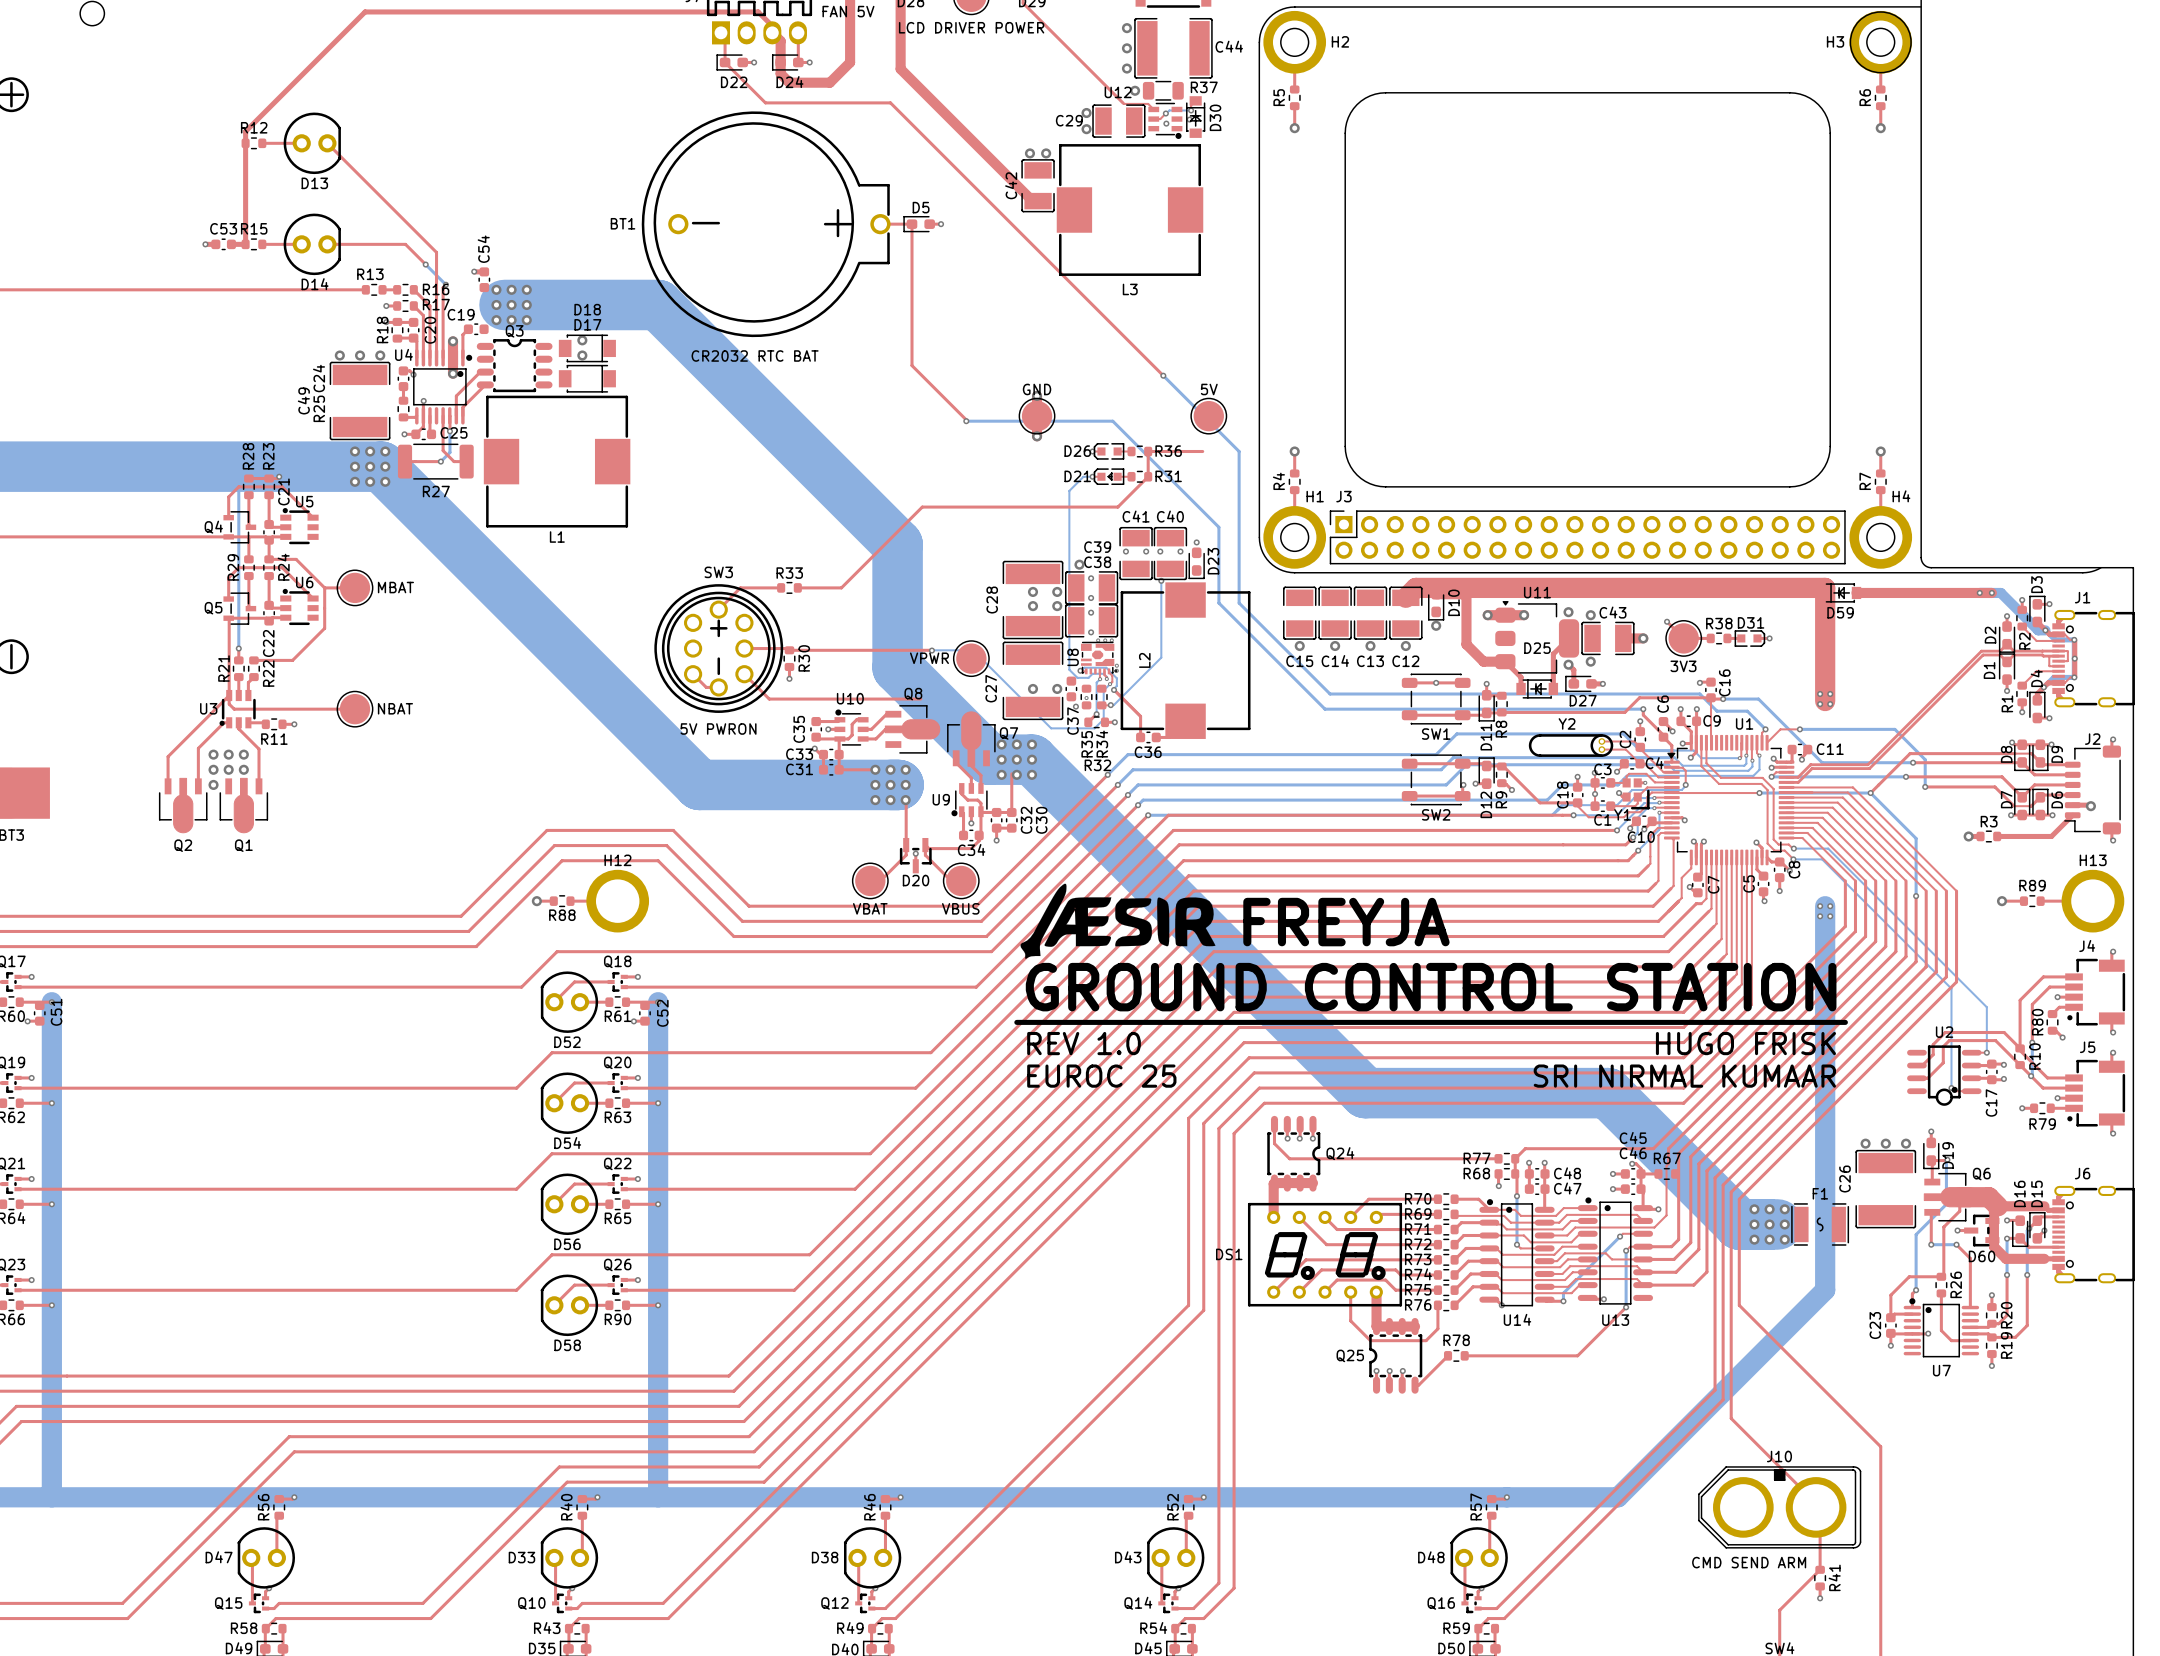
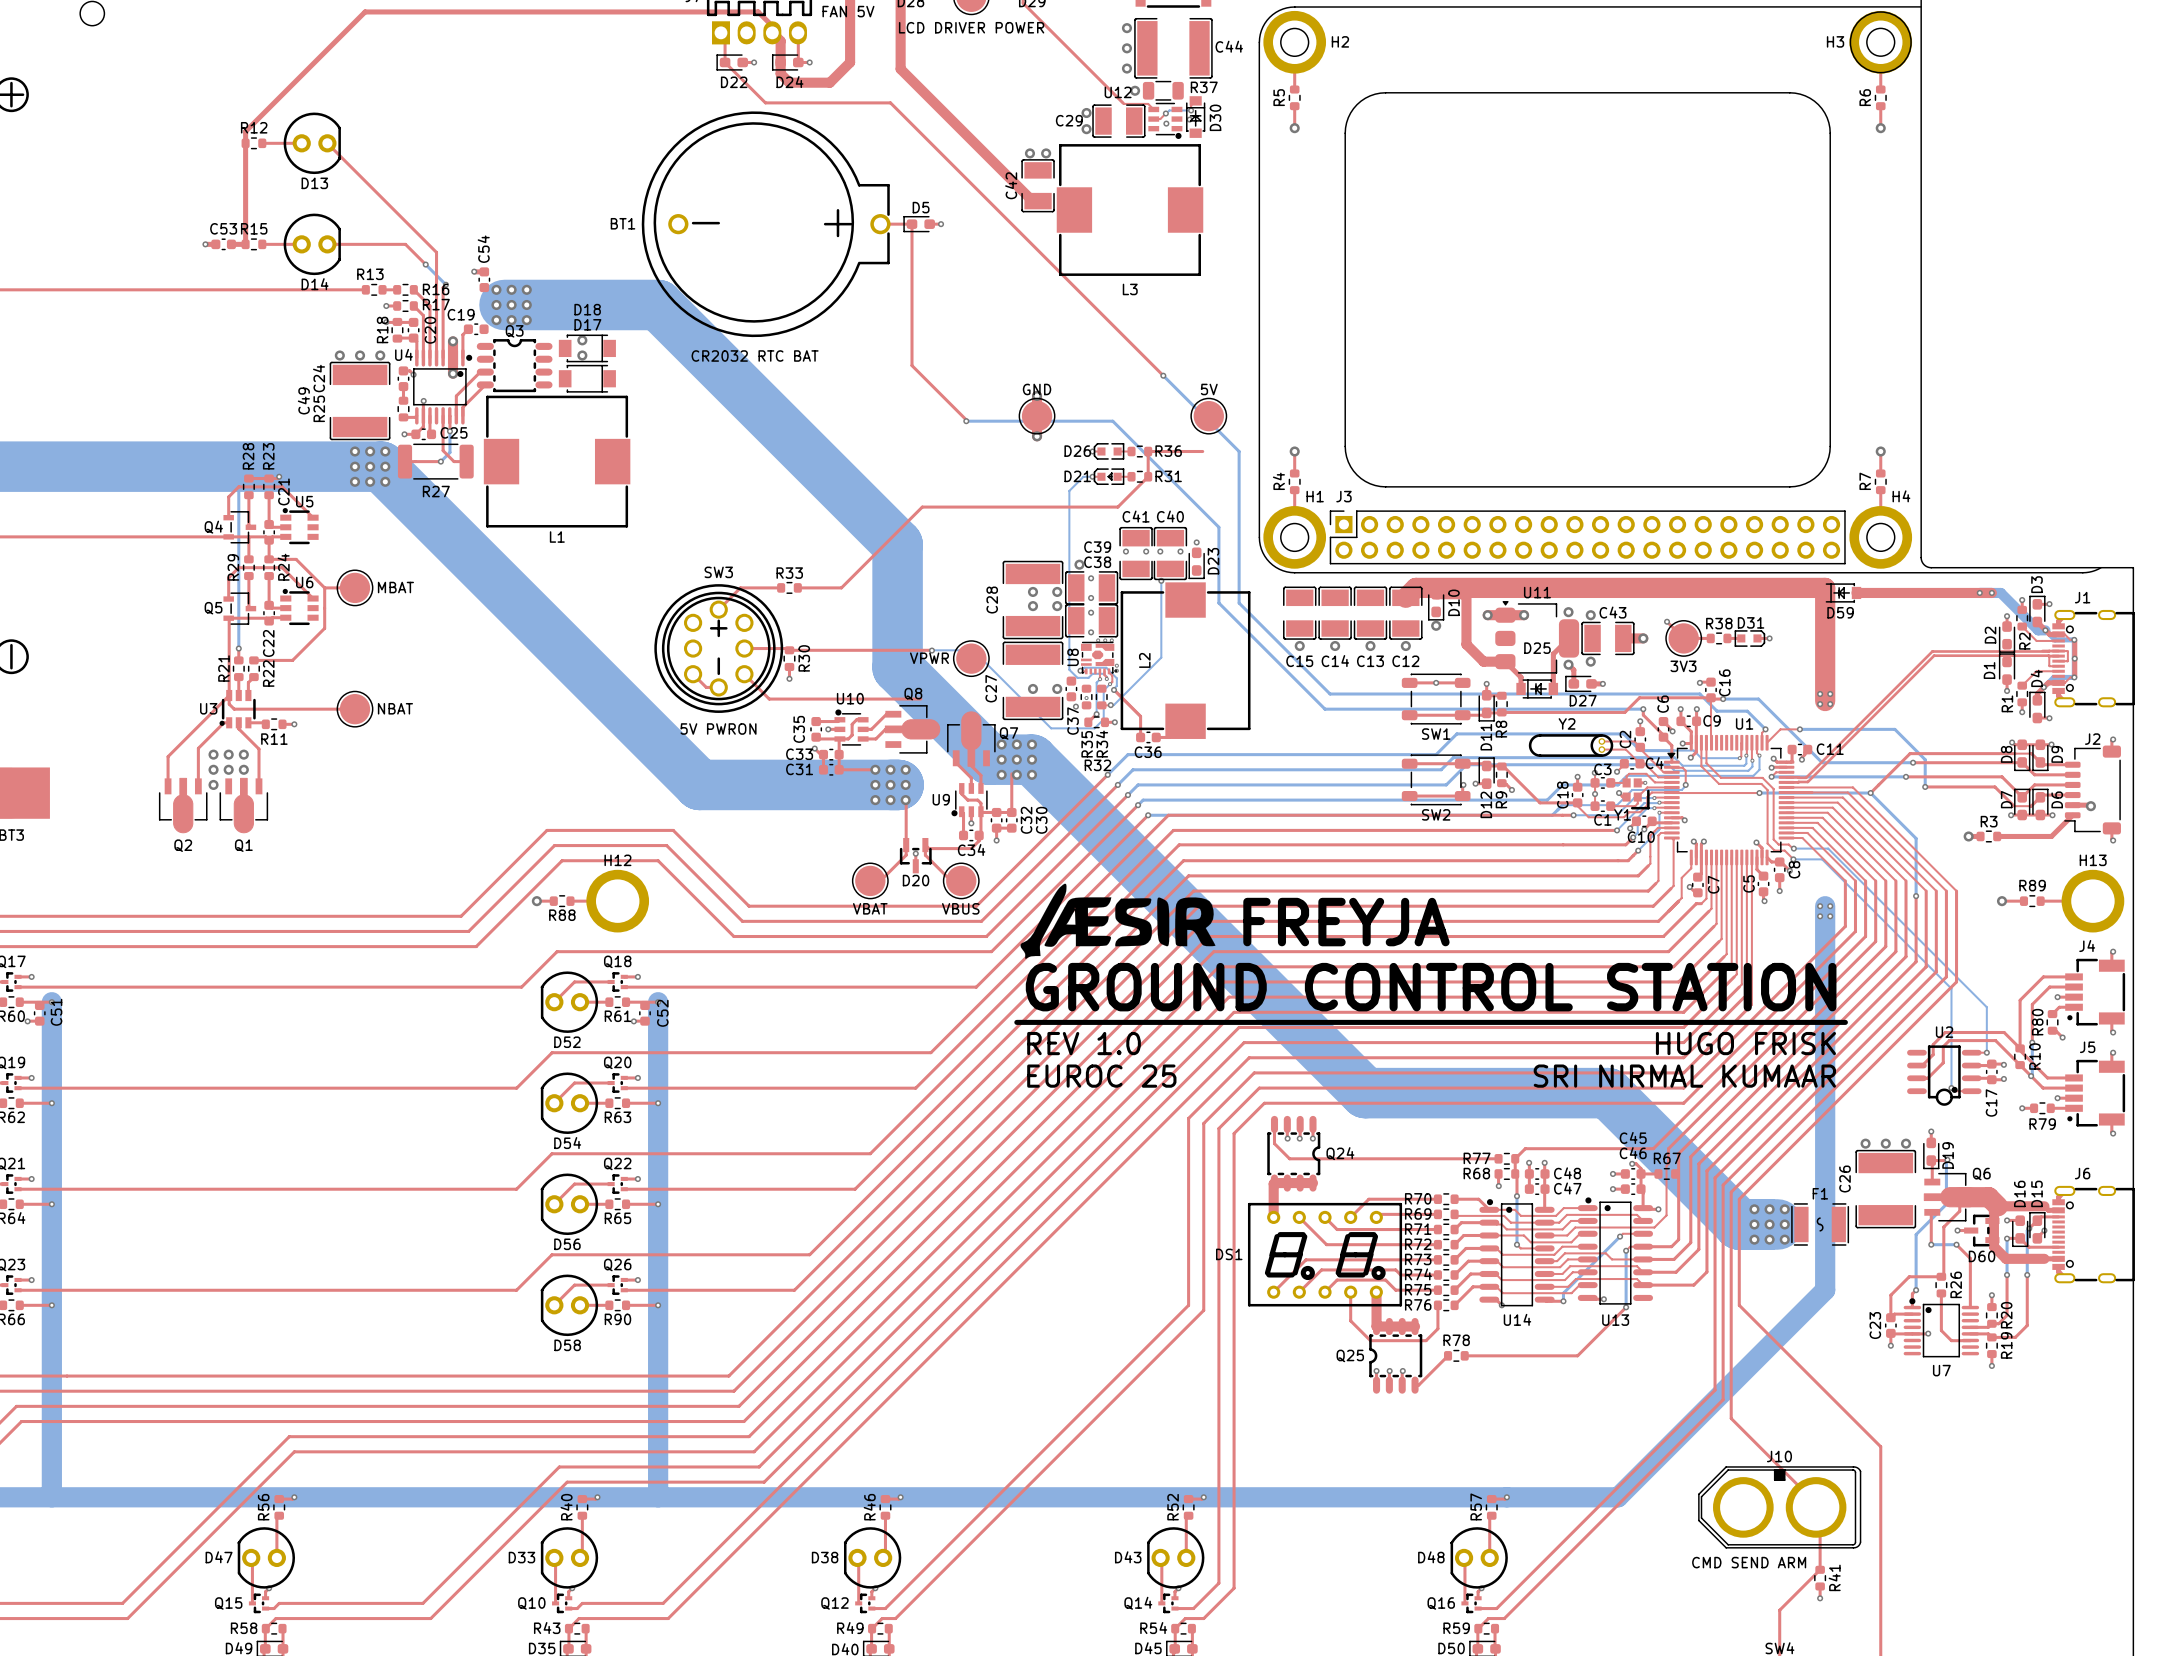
top track: (2042, 651) (2013, 651) (2007, 644) (2000, 651) (1981, 651) (1867, 764) (1810, 764) -> none
top track: (2049, 656) (2013, 655) (2007, 661) (2000, 655) (1983, 655) (1869, 768) (1812, 768) (1798, 781) -> (2049, 656) (1934, 655) (1807, 781) (1798, 781)
top track: (1810, 764) (1798, 777) -> (2049, 651) (1932, 651) (1806, 777) (1798, 777)

